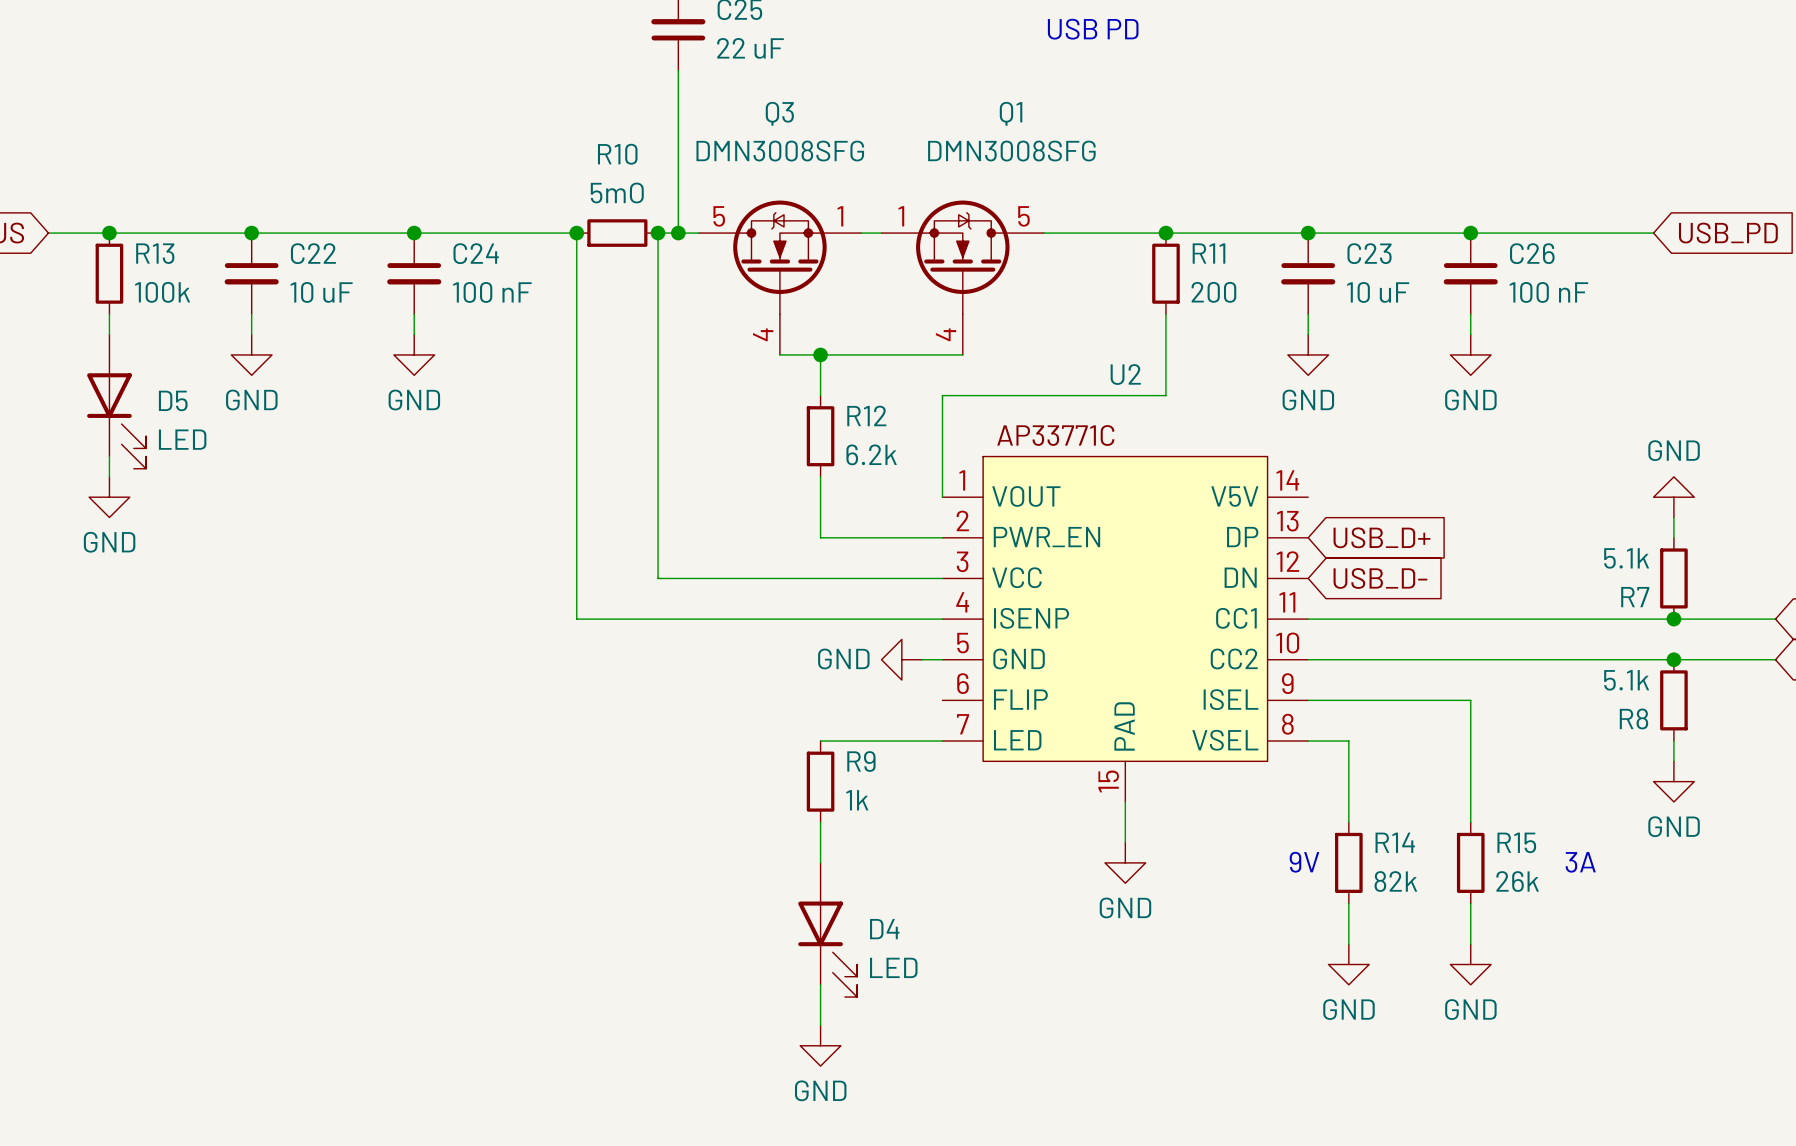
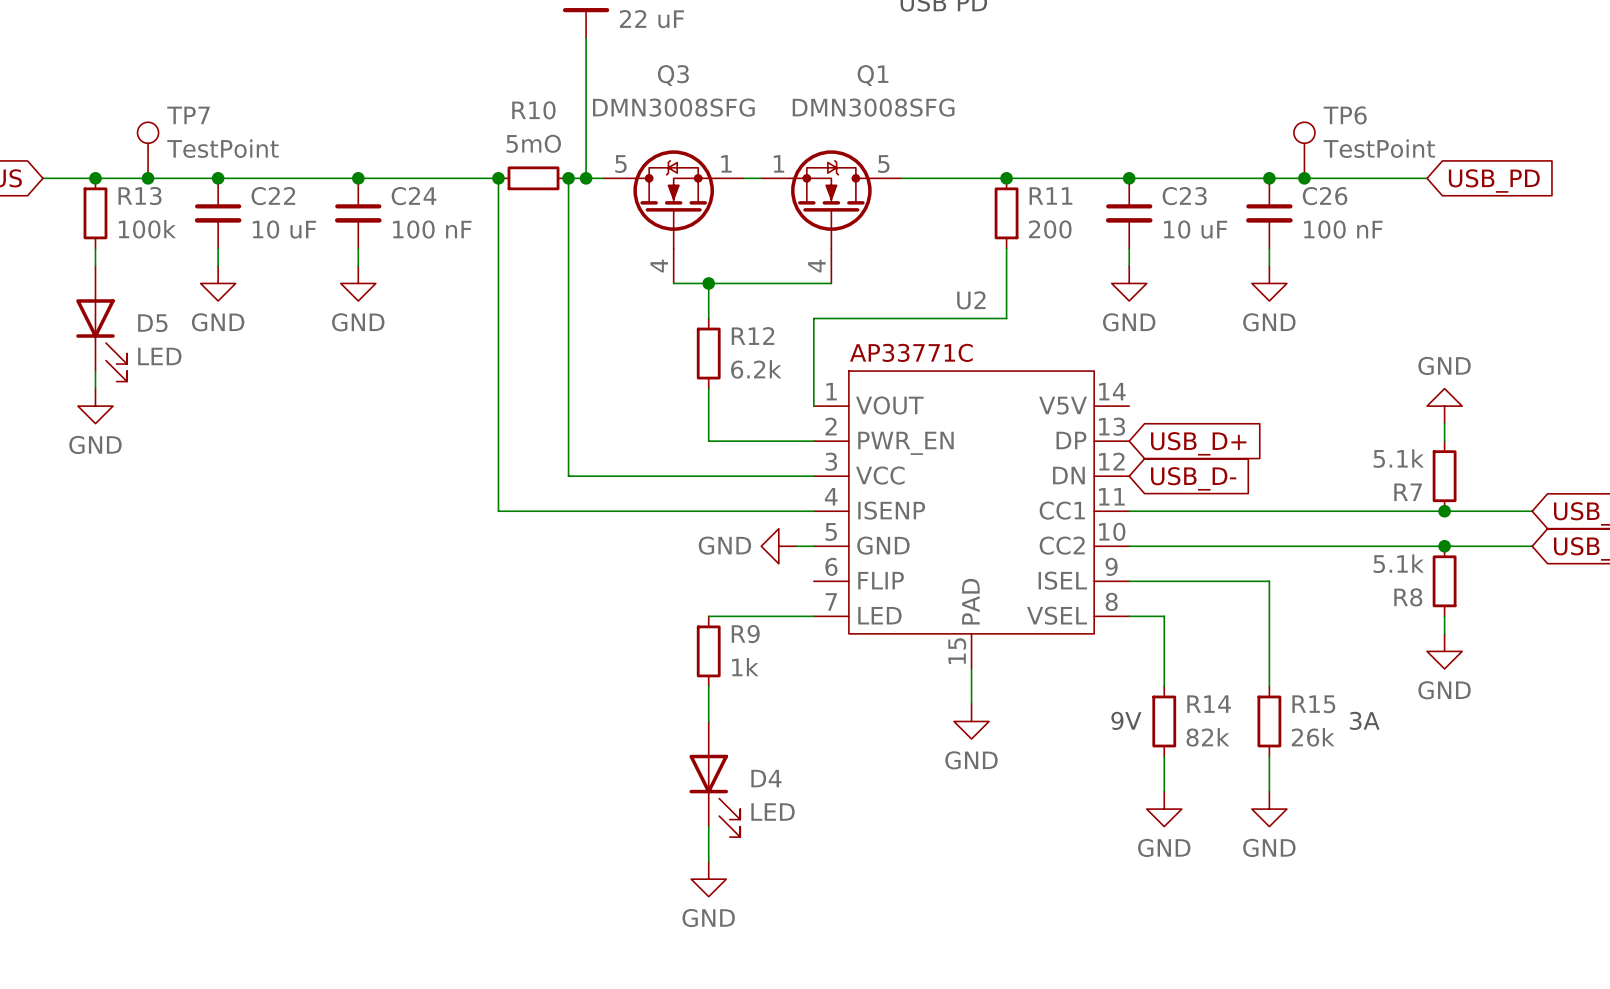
TP7: none -> TestPoint (148, 150)
TP6: none -> TestPoint (1304, 150)
junction: none -> (148, 178)
junction: none -> (1304, 178)

